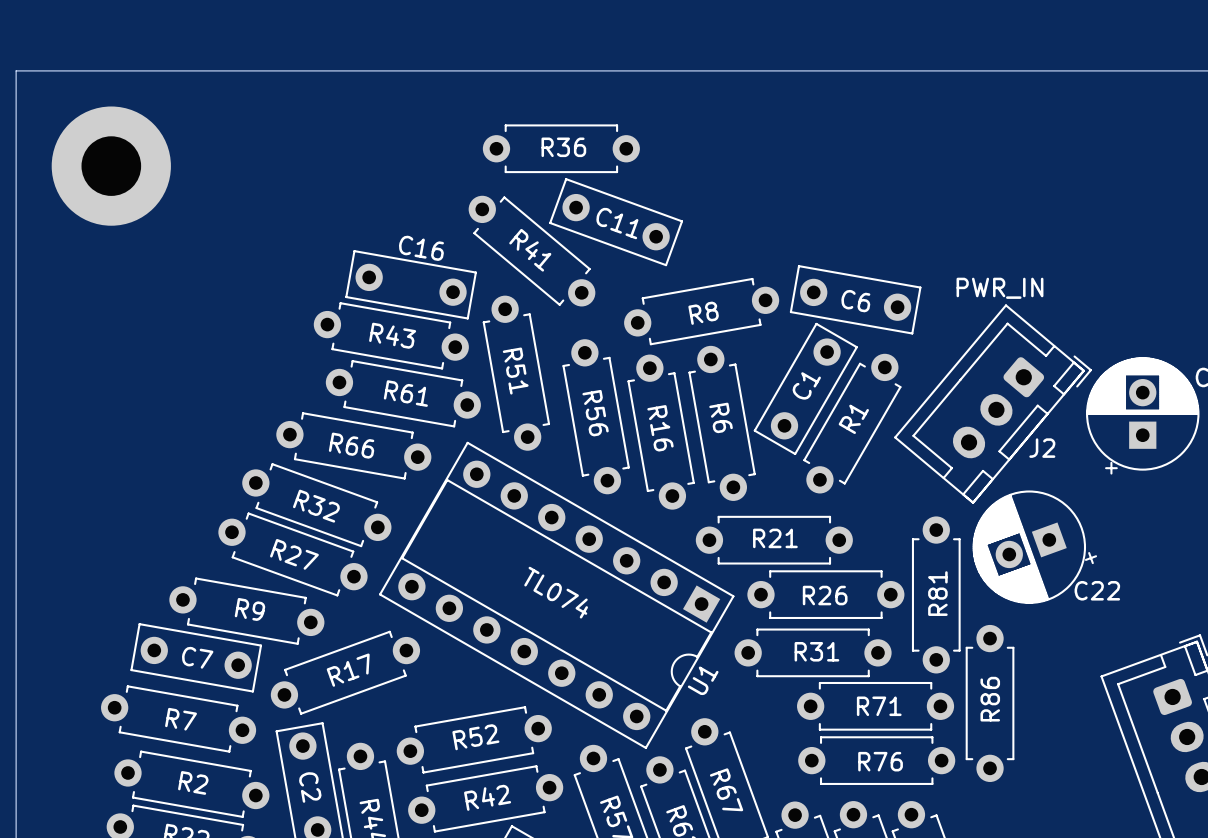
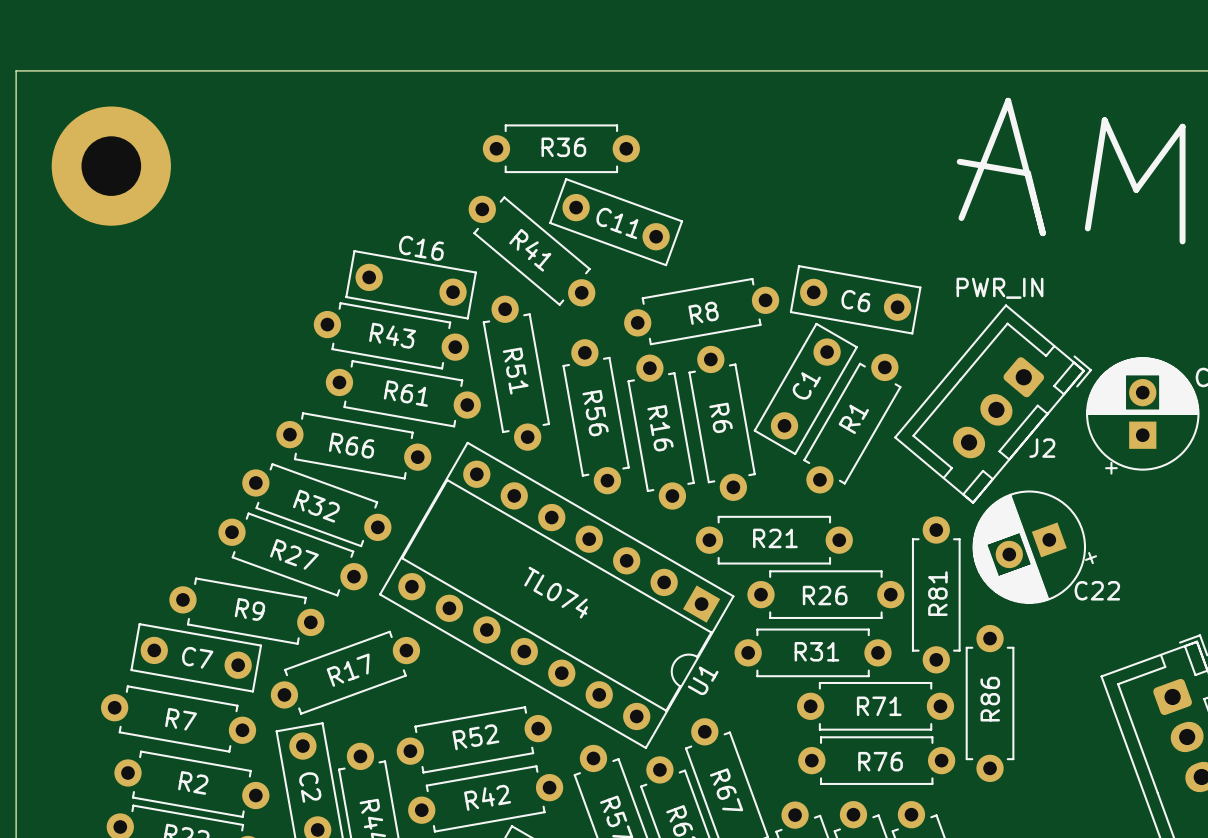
line: none -> (959, 161) (1028, 173) (1042, 233) (1008, 100) (961, 218)
line: none -> (1087, 228) (1104, 120) (1136, 189) (1182, 126) (1182, 241)

